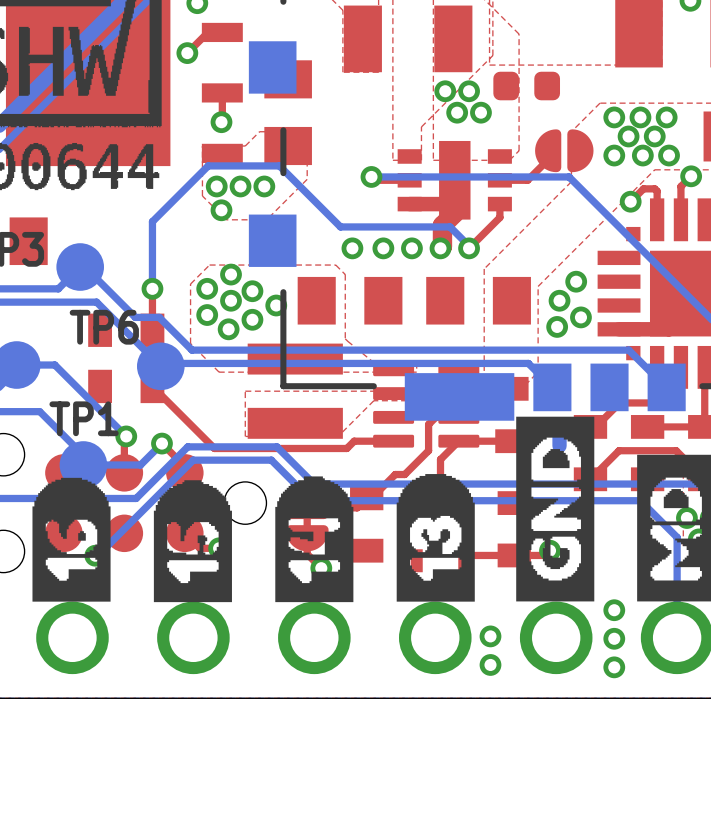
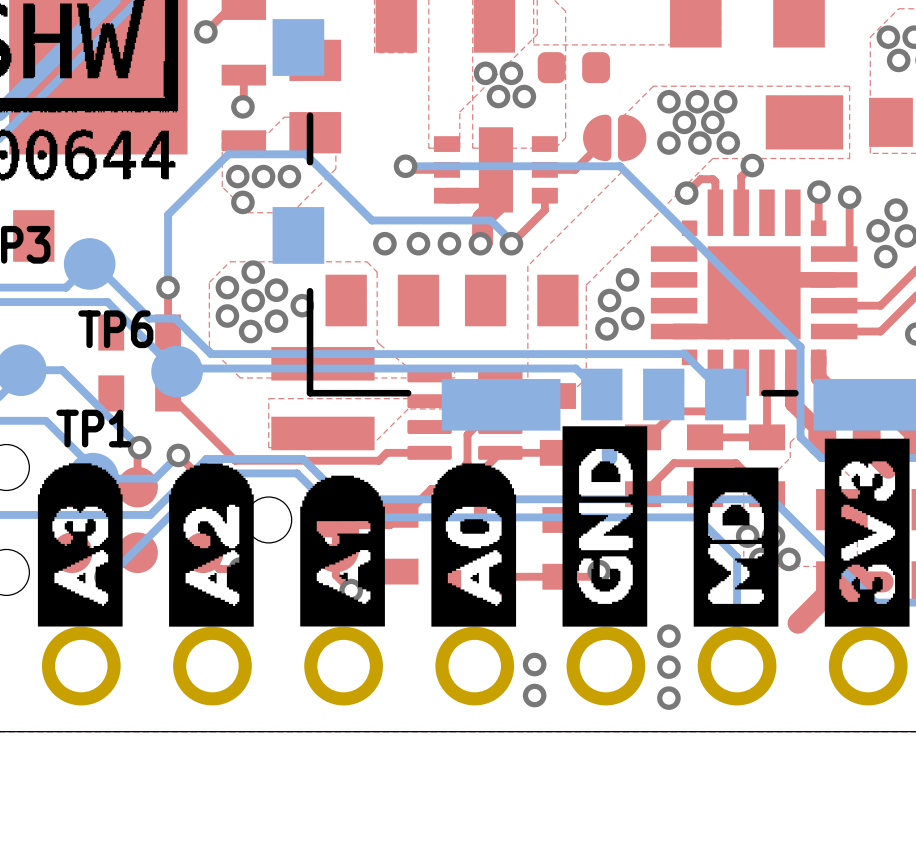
drawing shape: [396, 474, 475, 602] -> [431, 463, 517, 627]
drawing shape: [275, 476, 354, 603] -> [300, 475, 385, 627]
drawing shape: [32, 477, 111, 602] -> [37, 463, 123, 627]
drawing shape: [153, 480, 232, 603] -> [169, 463, 254, 627]

